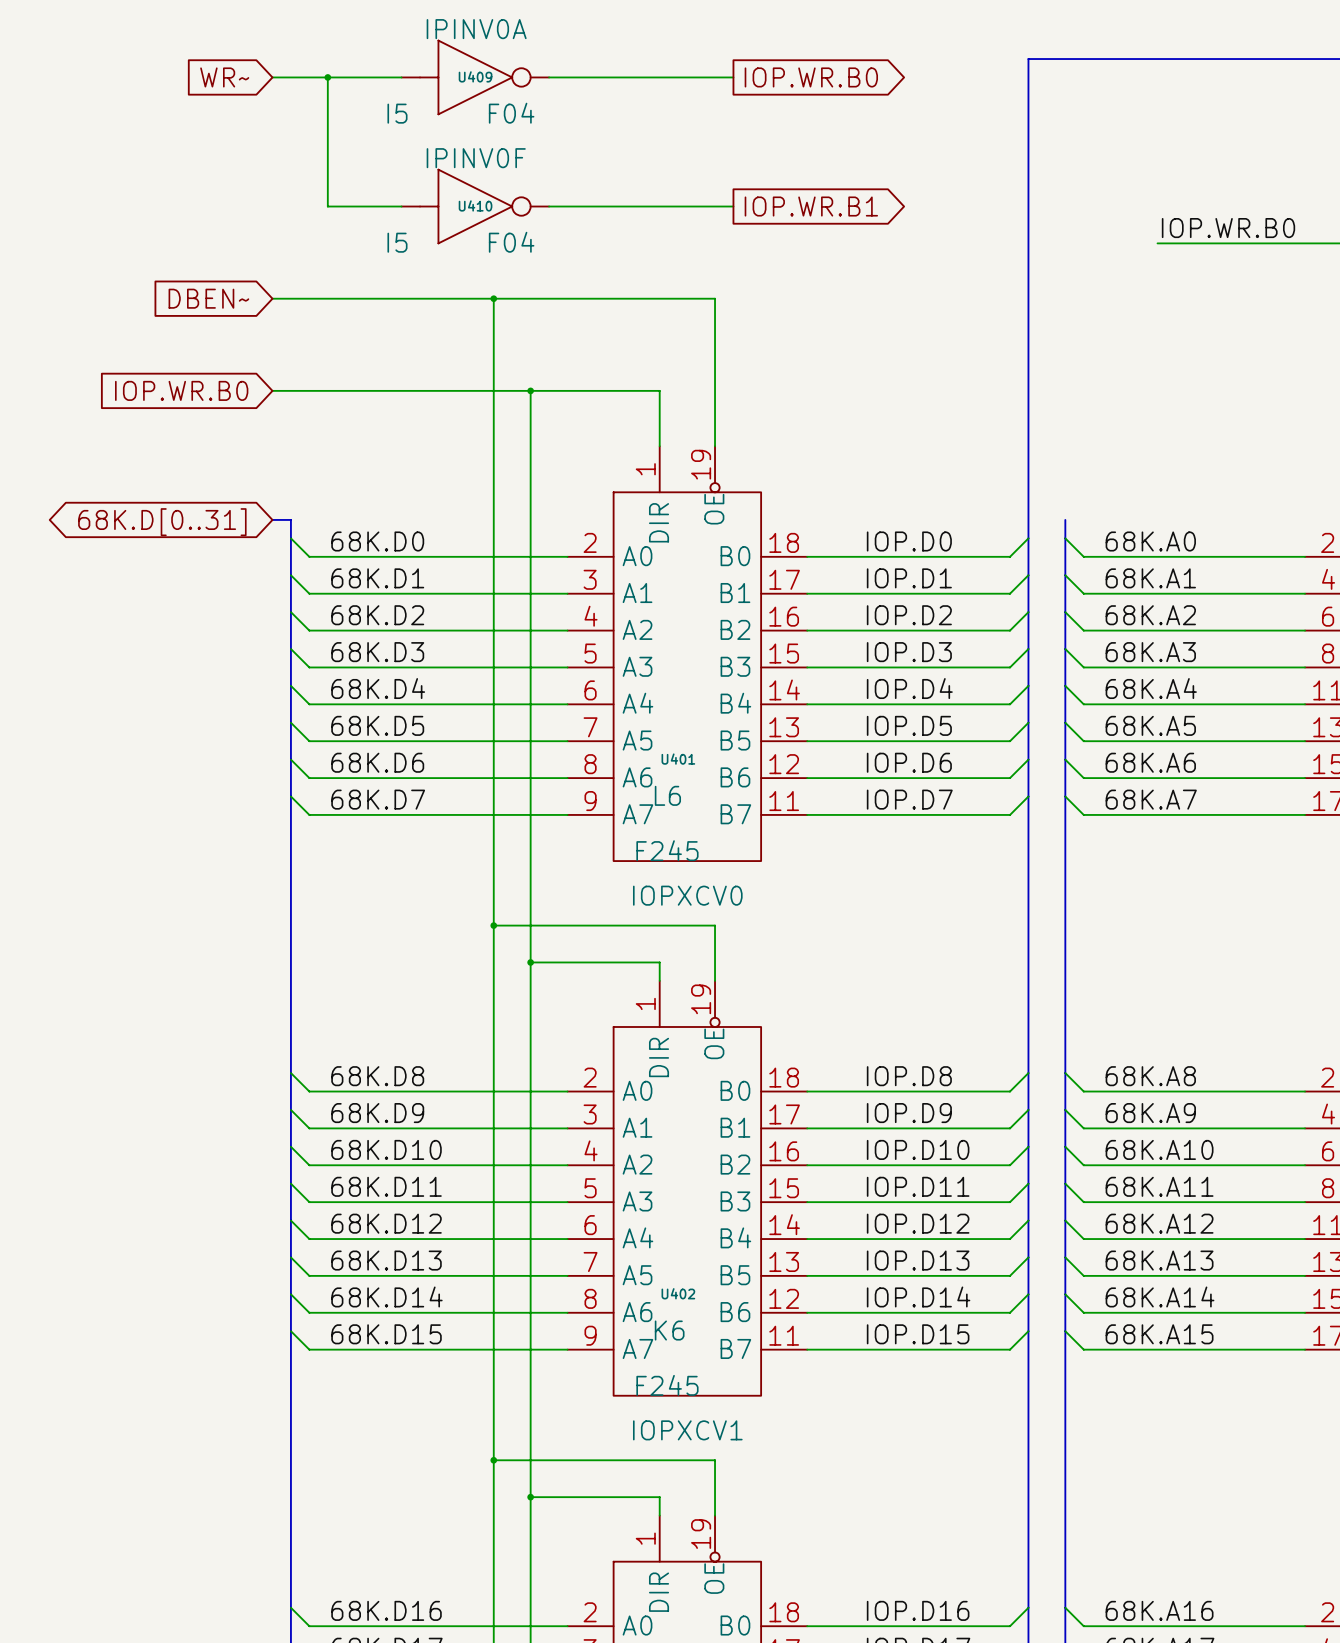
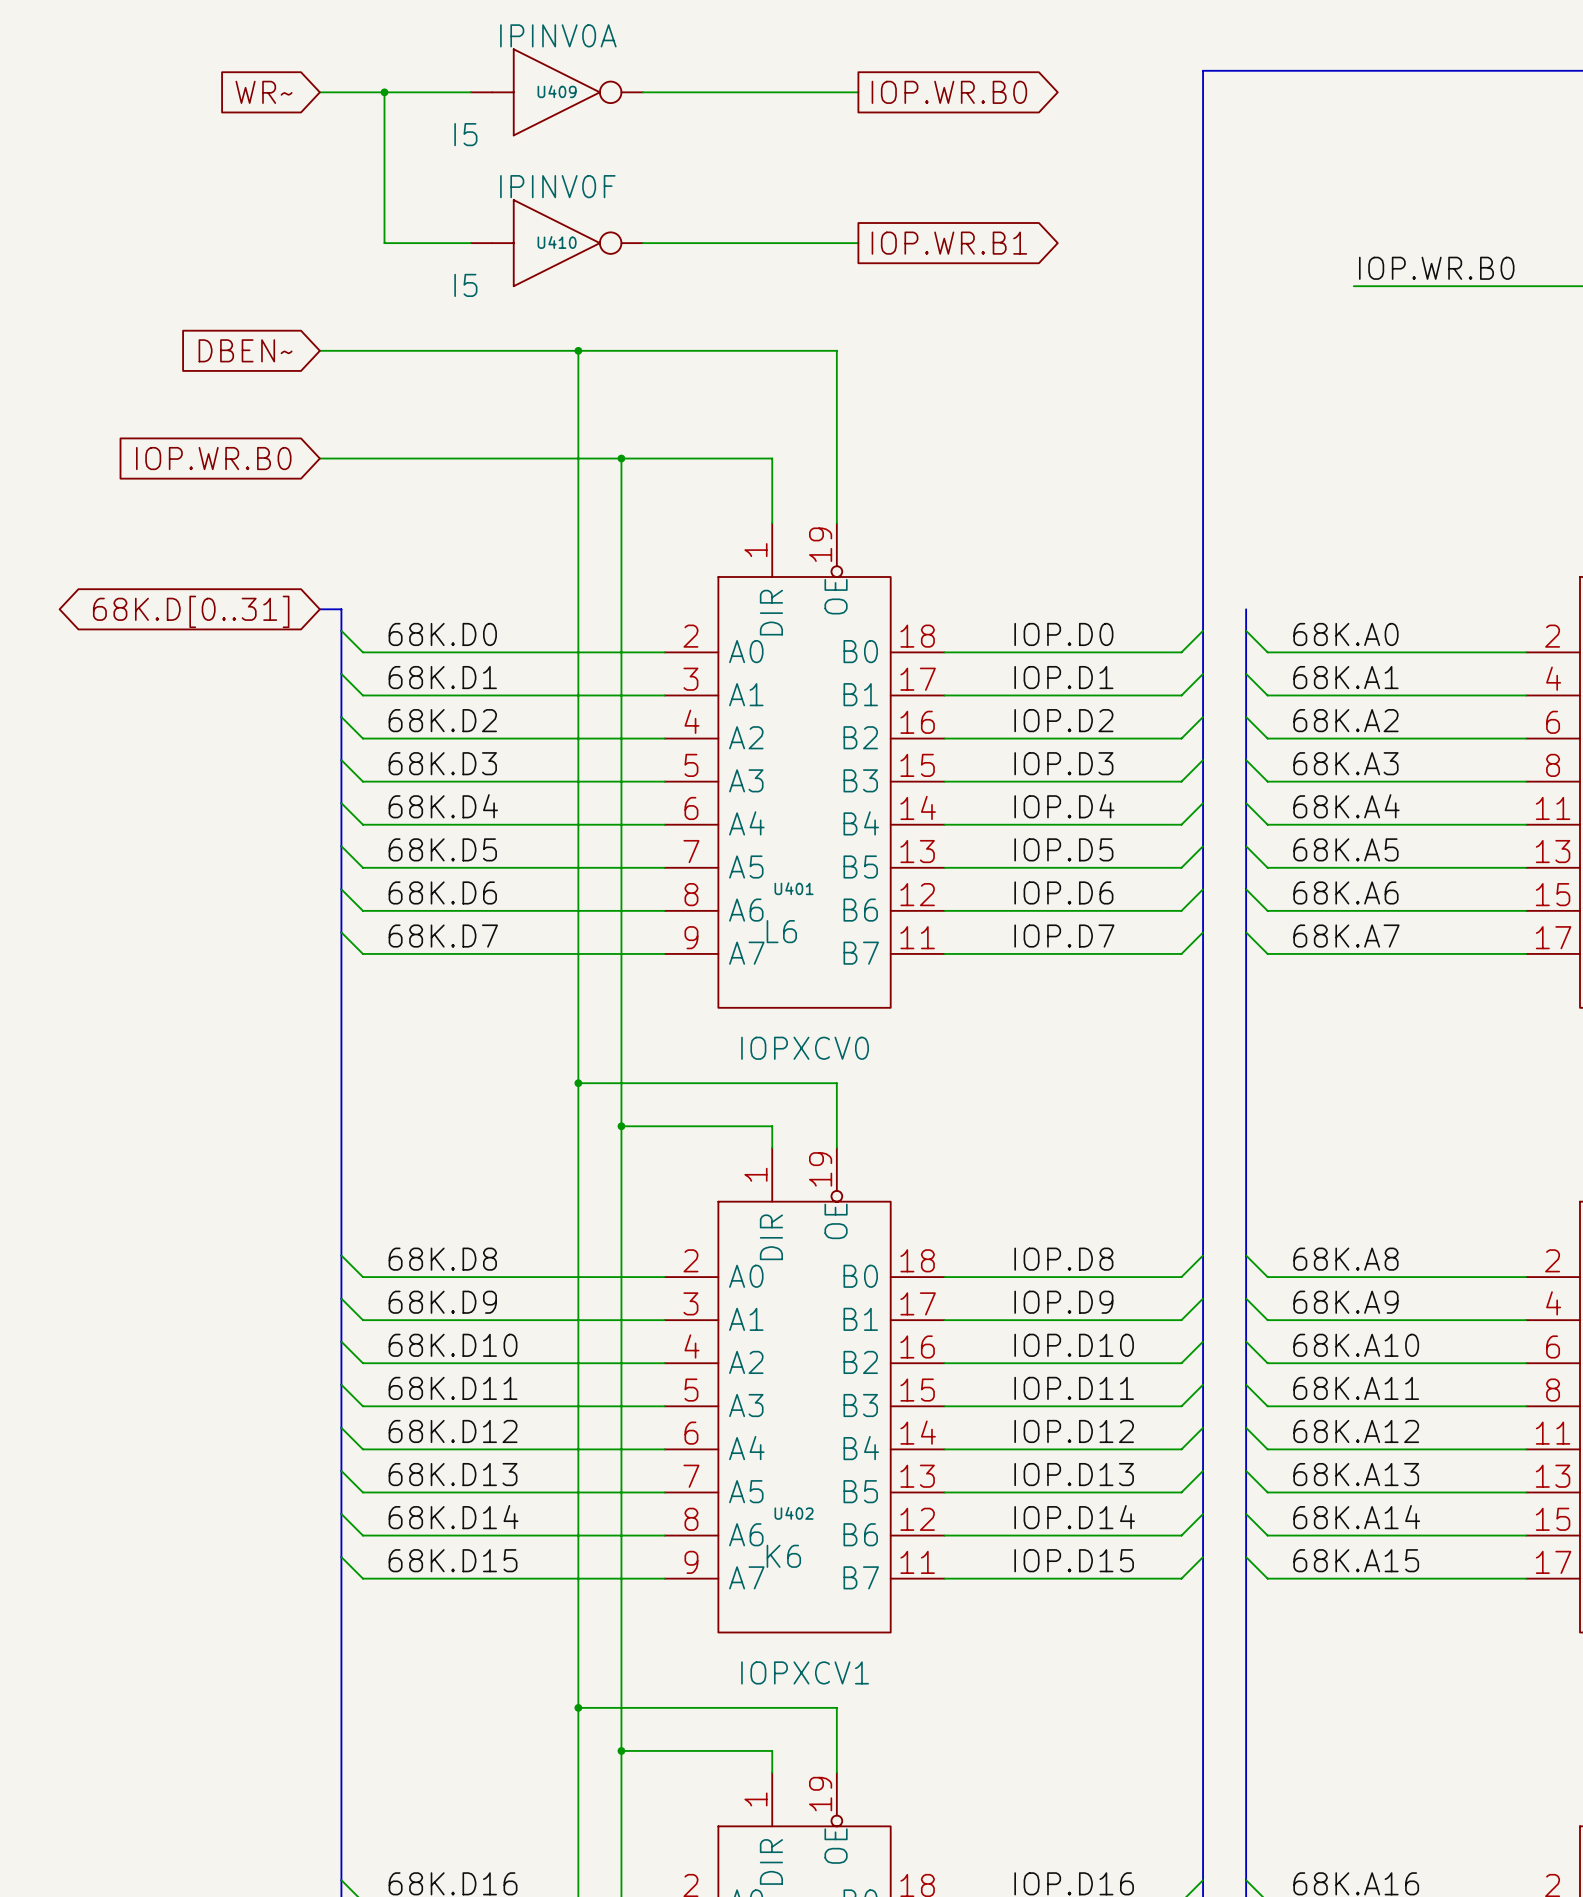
U409 value: F04 (511, 113) -> none
U410 value: F04 (511, 242) -> none
U401 value: F245 (667, 850) -> none
U402 value: F245 (667, 1385) -> none

